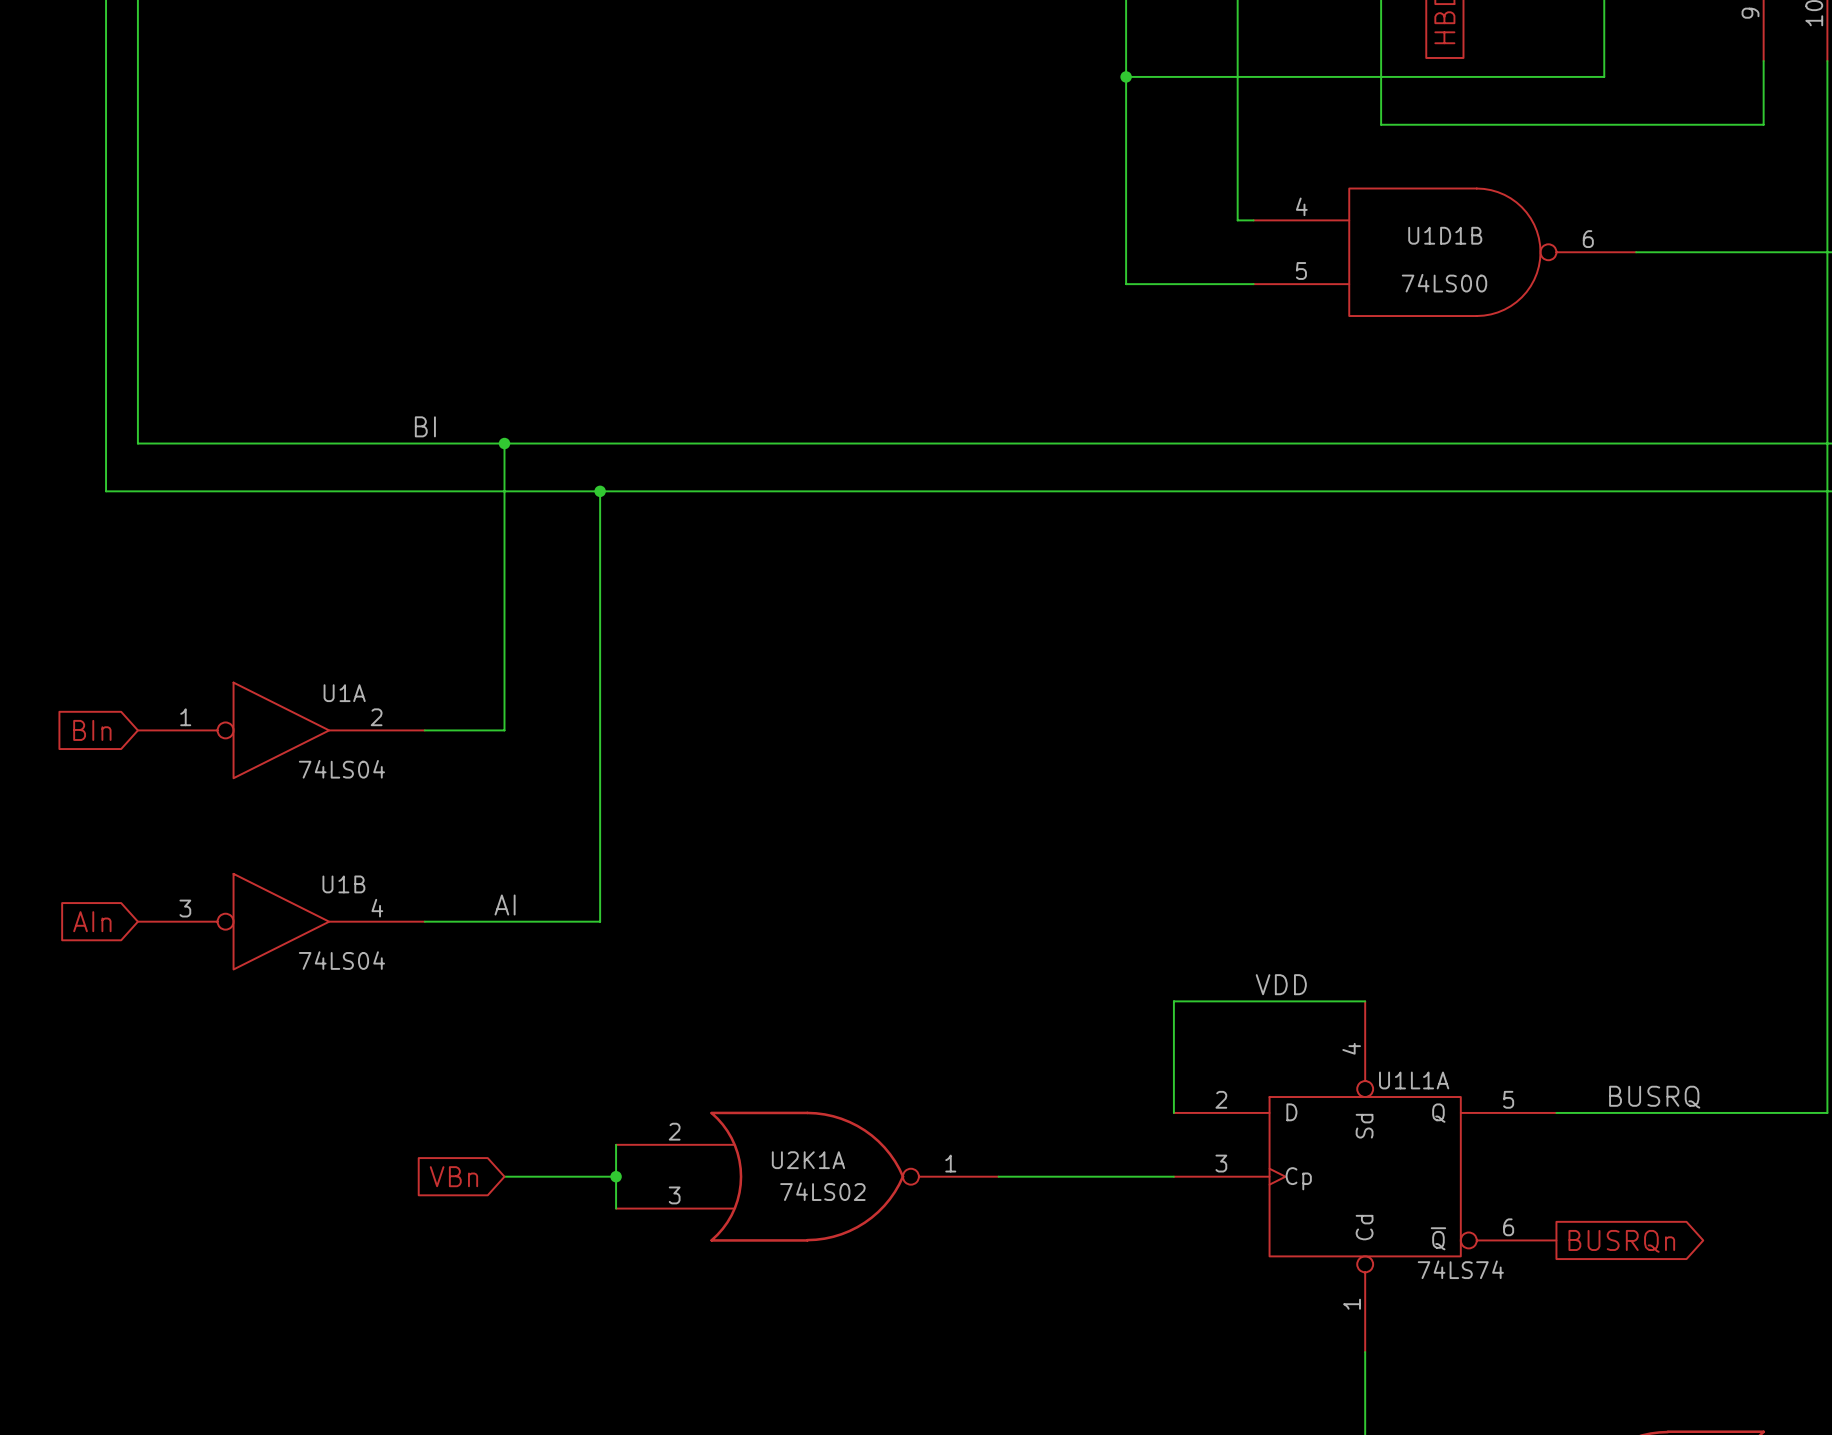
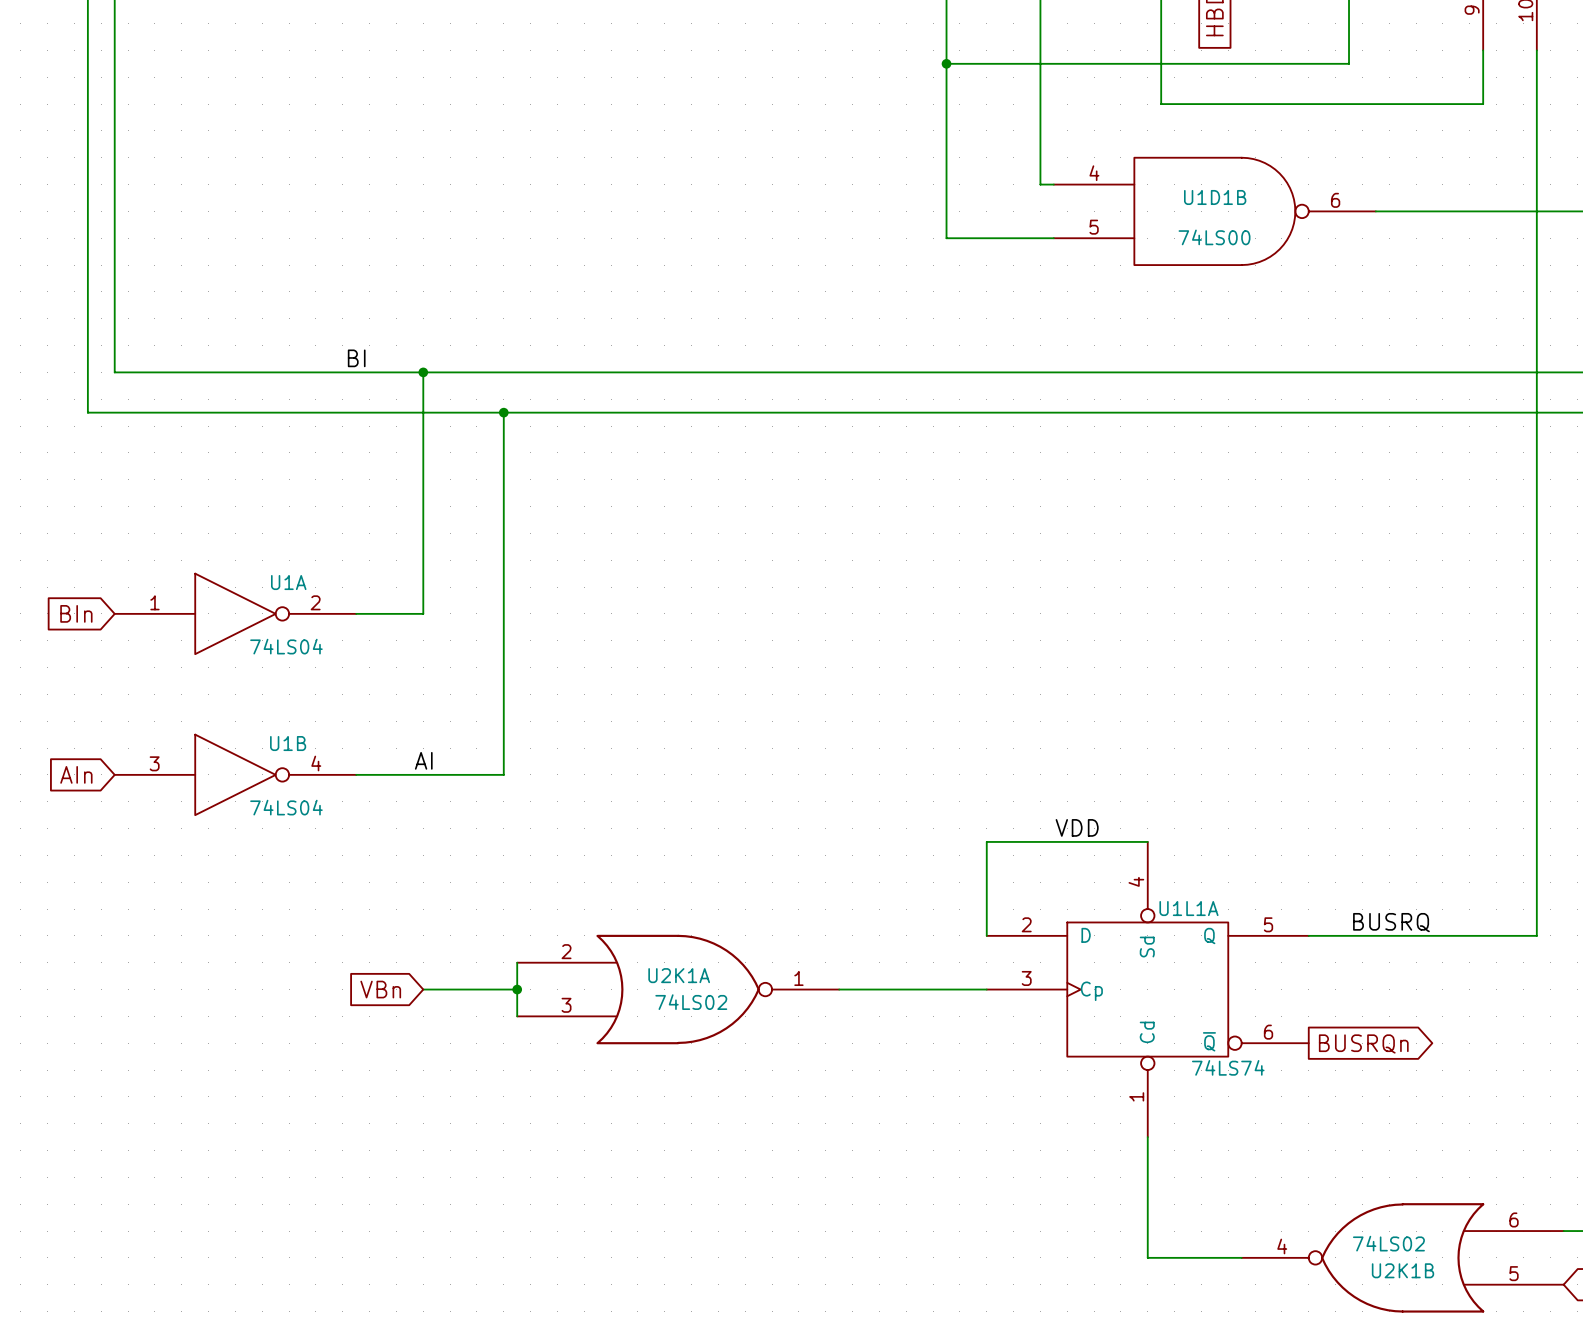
U1A symbol: [137, 682, 425, 779] -> [114, 573, 357, 655]
U1B symbol: [137, 873, 425, 970] -> [114, 734, 357, 816]

